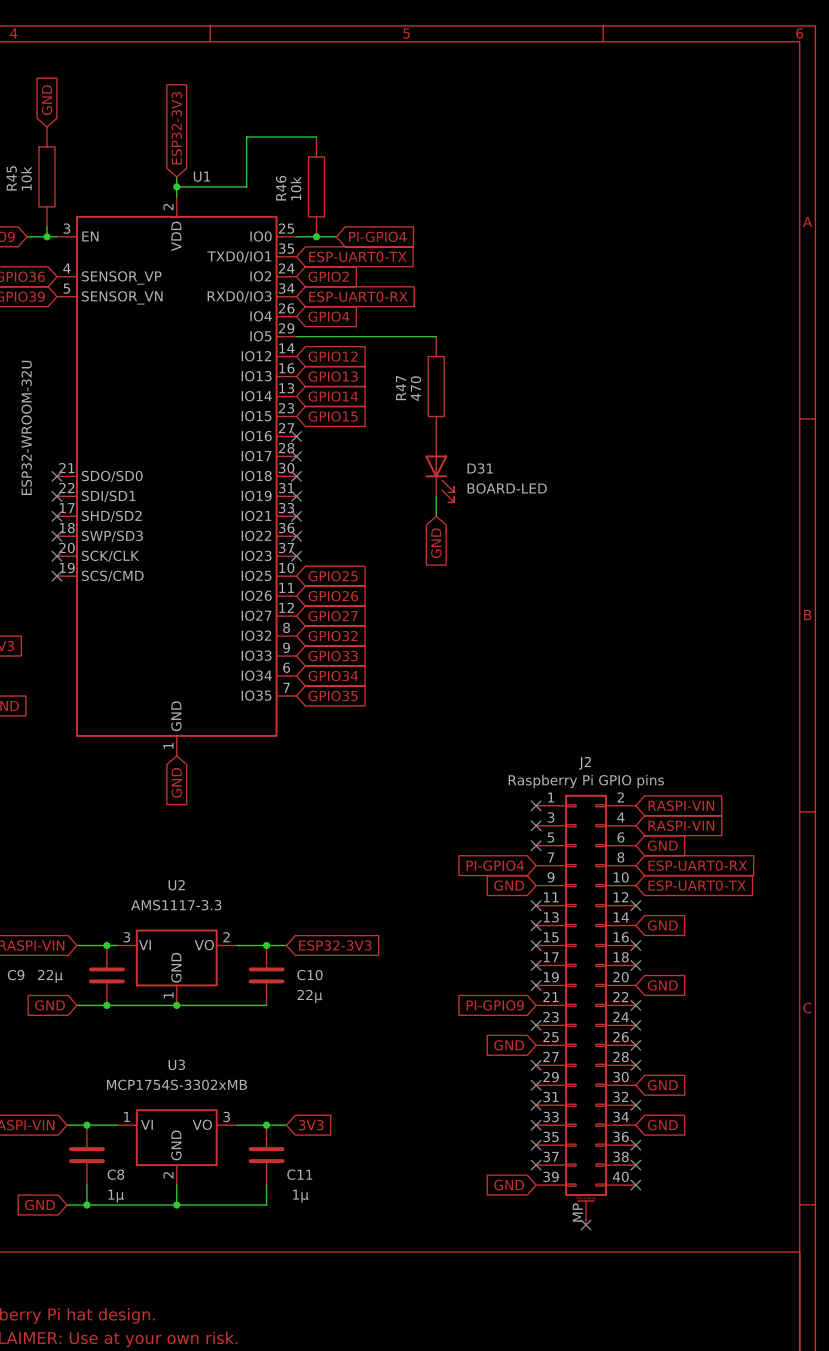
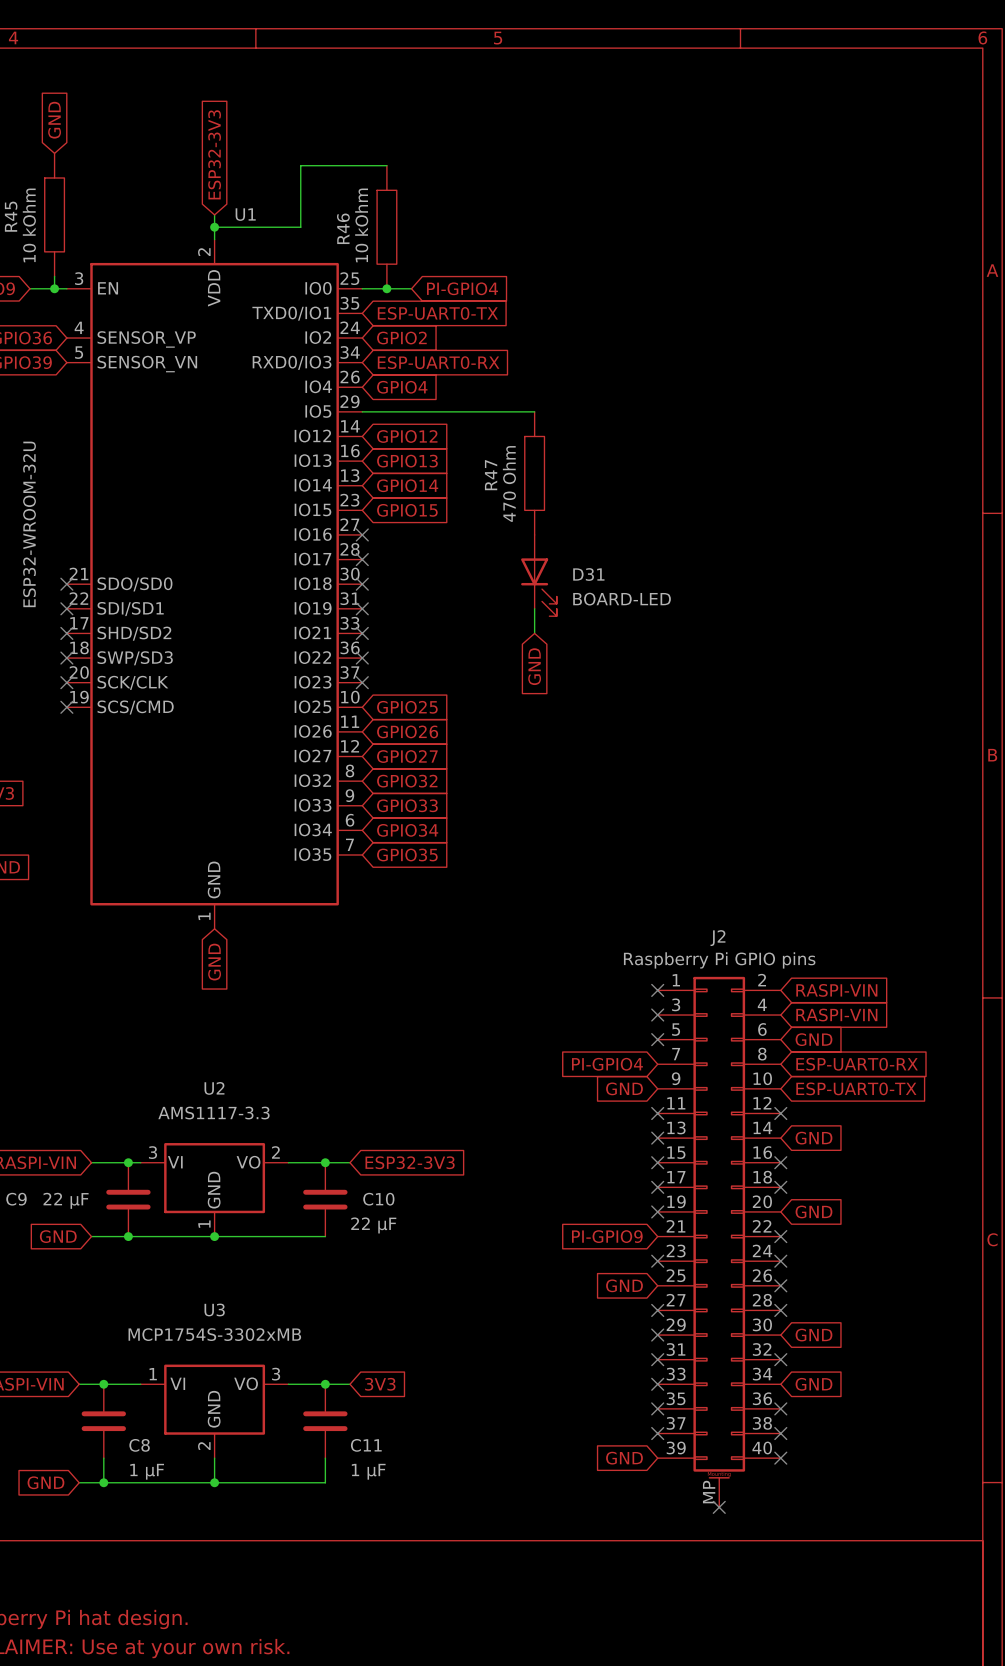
R45 value: 10k (26, 178) -> 10 kOhm (29, 225)
R46 value: 10k (296, 188) -> 10 kOhm (361, 225)
R47 value: 470 (415, 388) -> 470 Ohm (509, 483)
C9 value: 22µ (50, 976) -> 22 µF (66, 1200)
C10 value: 22µ (309, 996) -> 22 µF (373, 1225)
C8 value: 1µ (116, 1196) -> 1 µF (147, 1471)
C11 value: 1µ (300, 1196) -> 1 µF (368, 1471)

